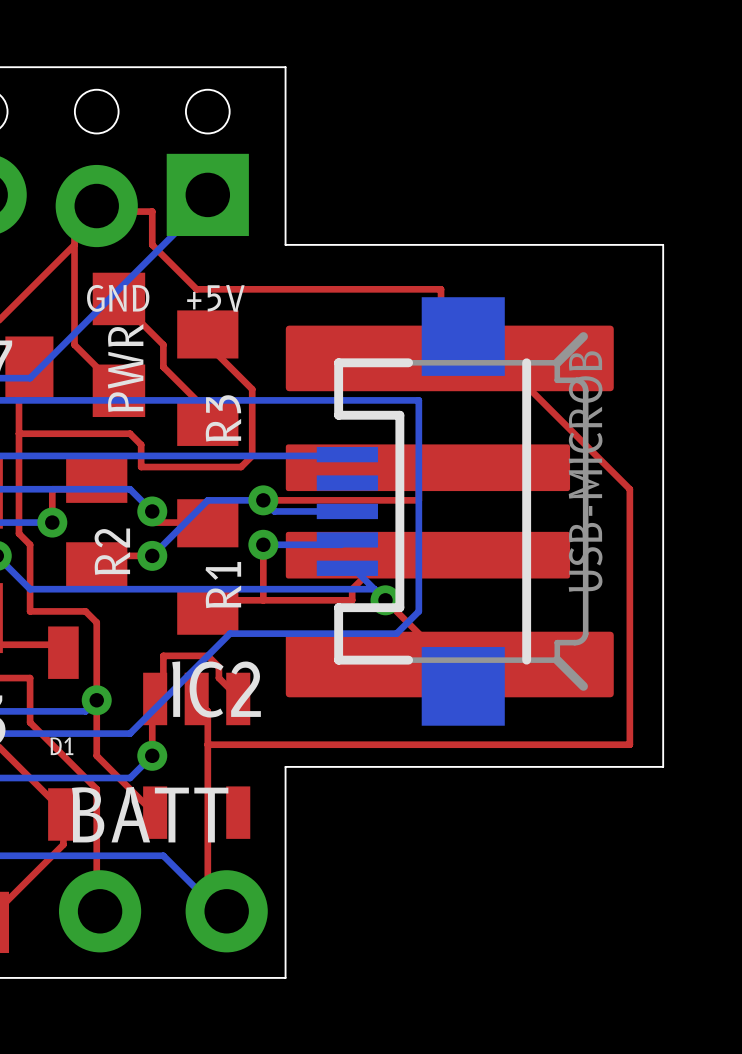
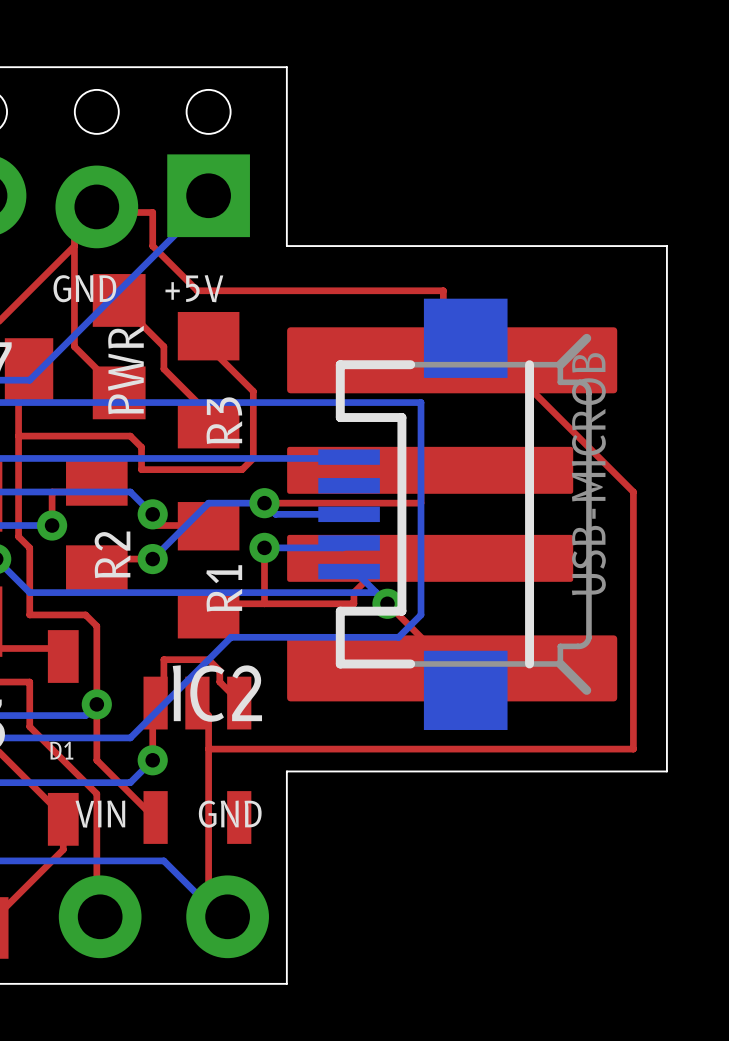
text position: GND (118, 298) -> GND (84, 288)
text position: +5V (215, 298) -> +5V (194, 288)
text: none -> VIN (100, 814)
text: none -> GND (230, 814)
BATT name: BATT (150, 814) -> none

